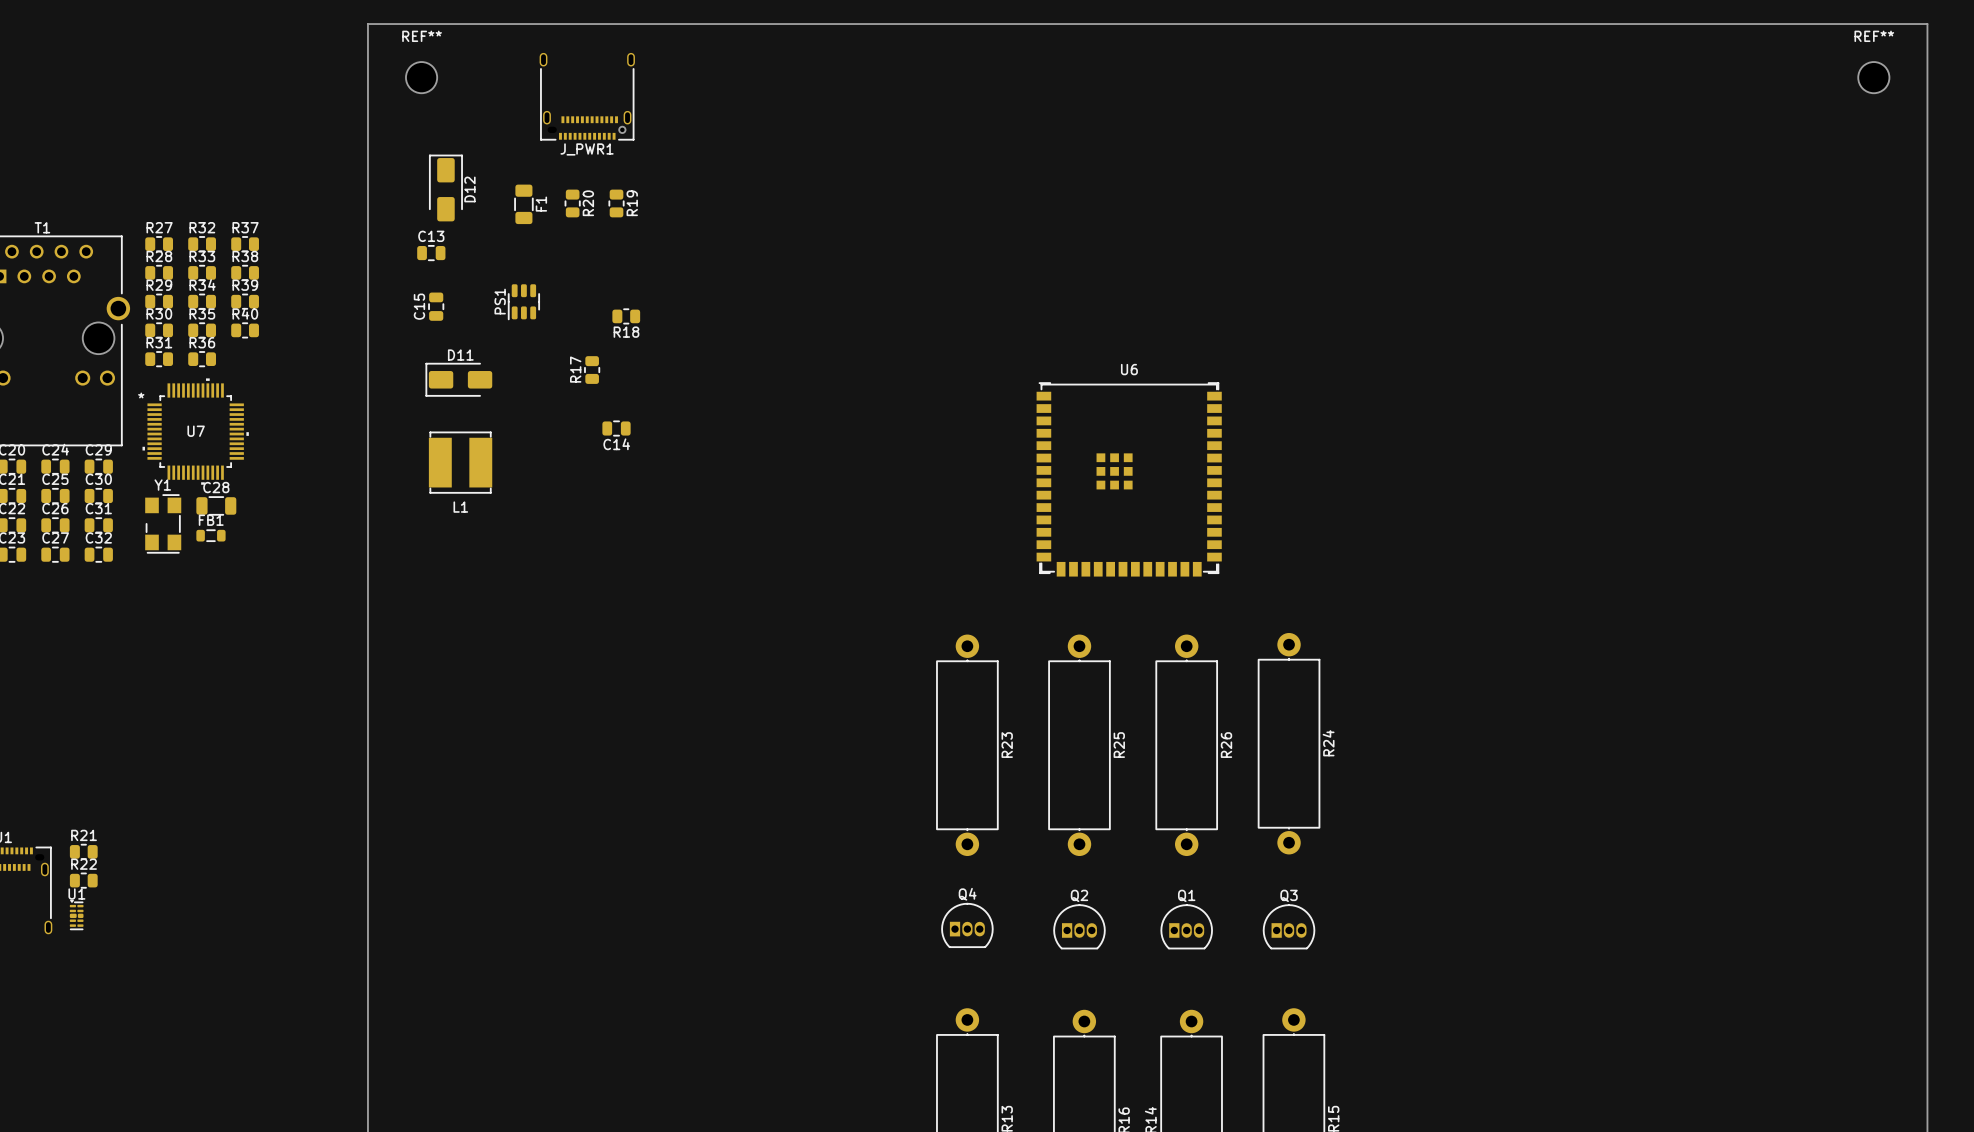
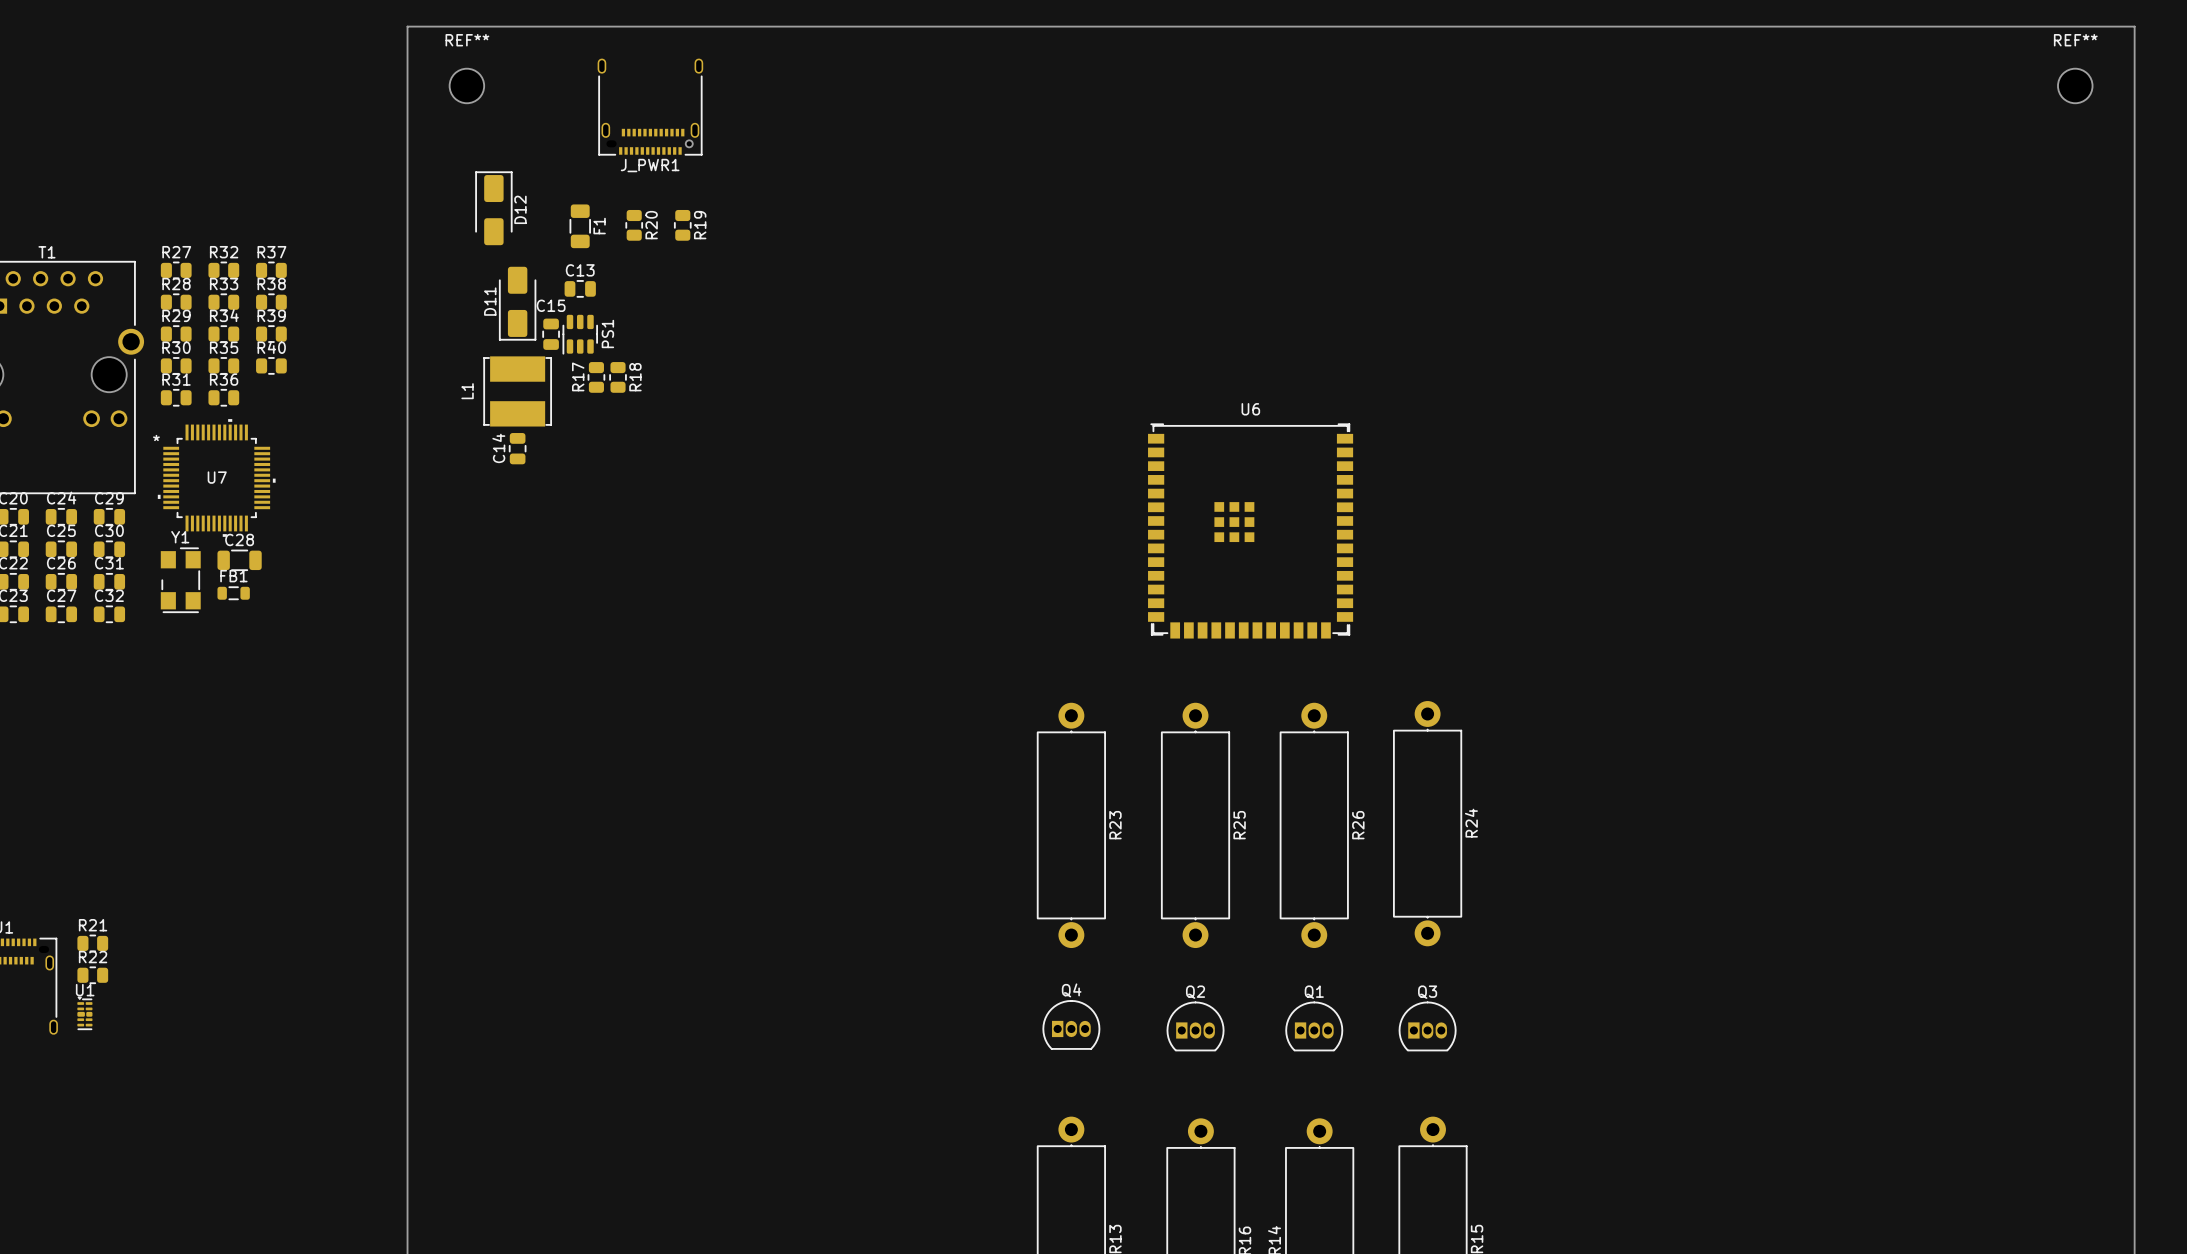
C13 position: (431, 253) -> (580, 288)
PS1 name position: PS1 (500, 301) -> PS1 (607, 333)
C15 name rotation: 0° (419, 306) -> 90° clockwise (551, 305)
C15 position: (436, 306) -> (551, 334)
R18 rotation: 0° (626, 316) -> 90° clockwise (618, 377)
R18 position: (626, 316) -> (618, 377)
R18 name position: R18 (626, 332) -> R18 (635, 377)
R17 position: (592, 370) -> (596, 377)
D11 rotation: 0° (459, 379) -> 90° counterclockwise (517, 303)
D11 position: (459, 379) -> (517, 303)
C14 rotation: 0° (616, 428) -> 90° clockwise (517, 448)
C14 position: (616, 428) -> (517, 448)
L1 rotation: 0° (460, 462) -> 90° clockwise (517, 391)
L1 position: (460, 462) -> (517, 391)

